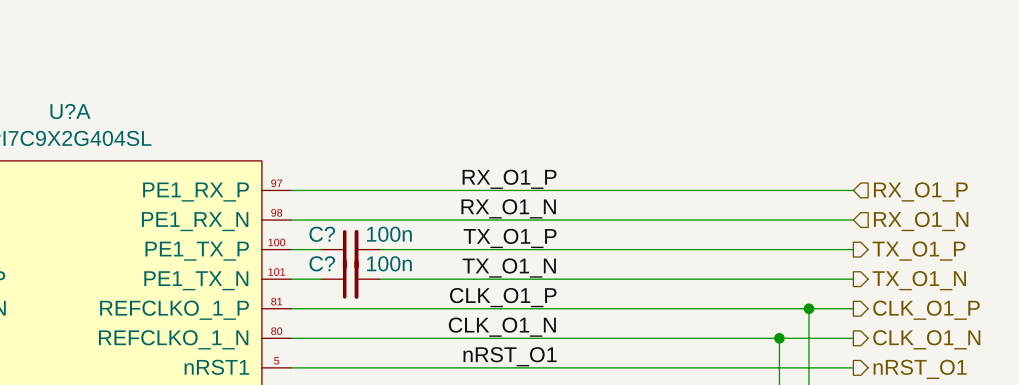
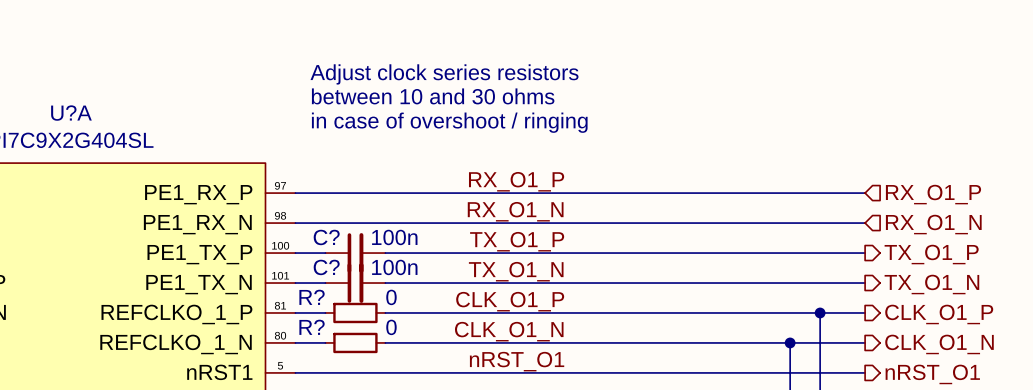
text: none -> Adjust clock series resistors (444, 74)
text: none -> between 10 and 30 ohms (433, 96)
text: none -> in case of overshoot / ringing (449, 122)
wire: (321, 308) (380, 308) -> none
R?: none -> 0 (355, 312)
wire: (321, 338) (380, 338) -> none
R?: none -> 0 (355, 342)

